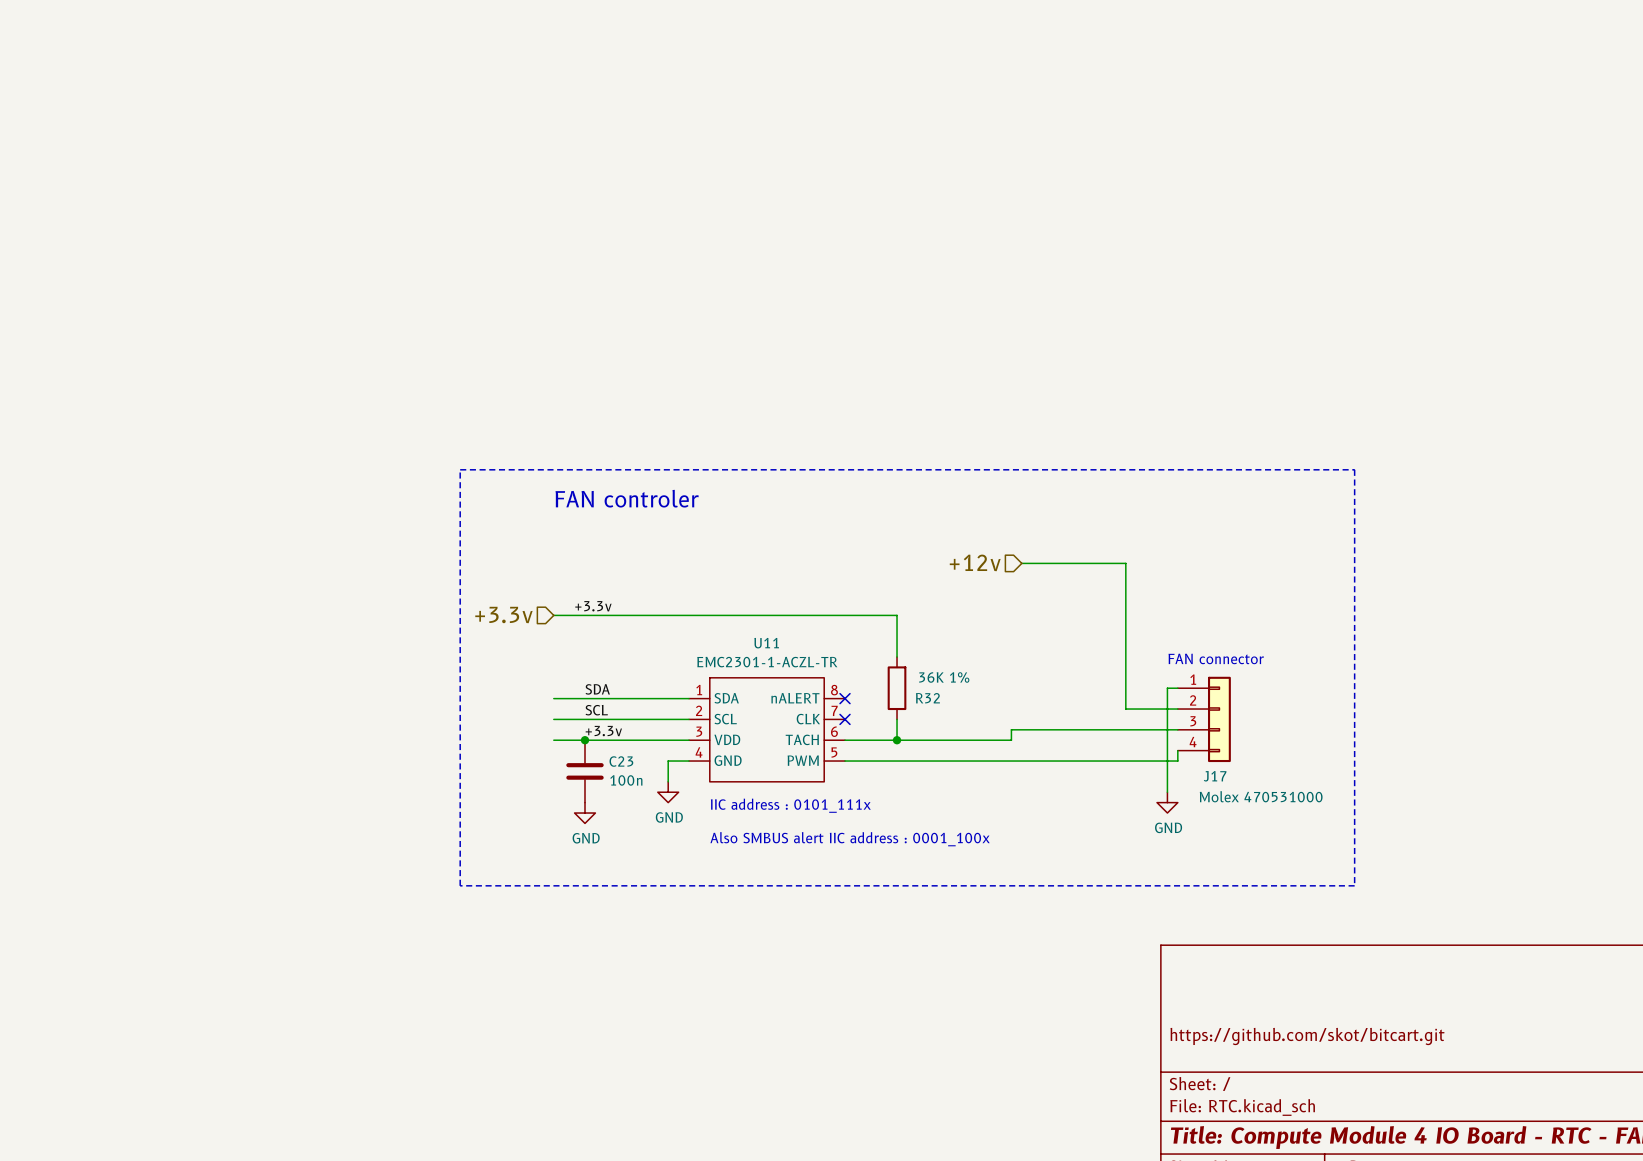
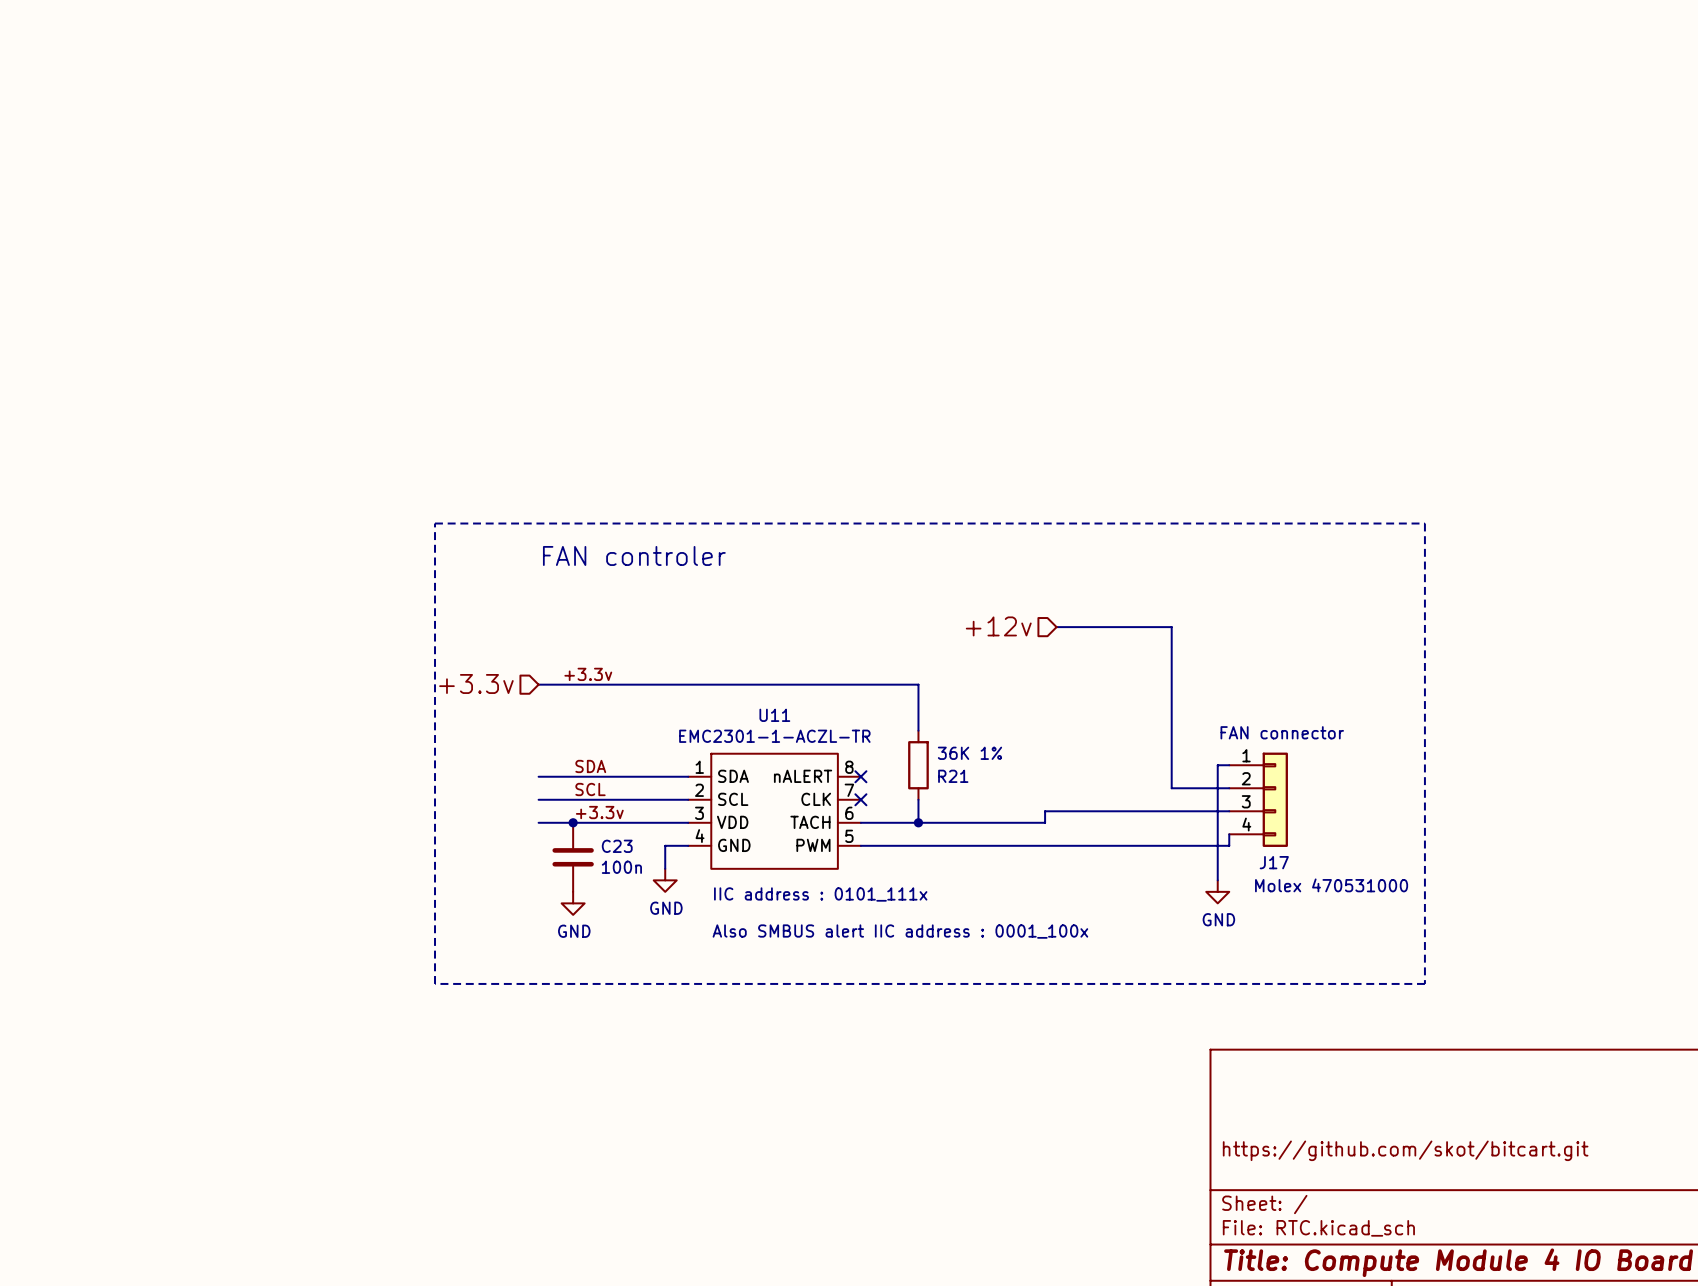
R32 name: R32 (927, 698) -> R21 (953, 776)

